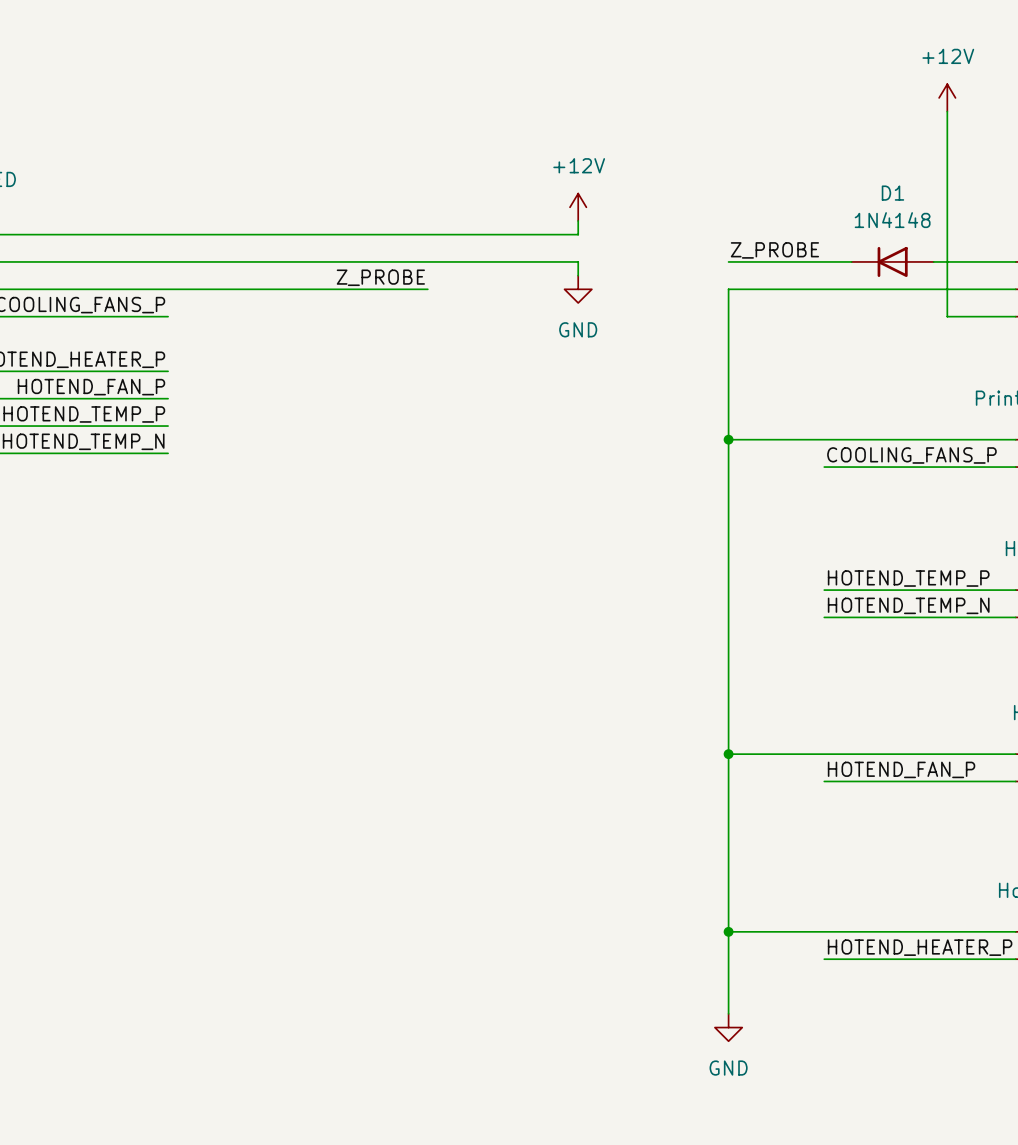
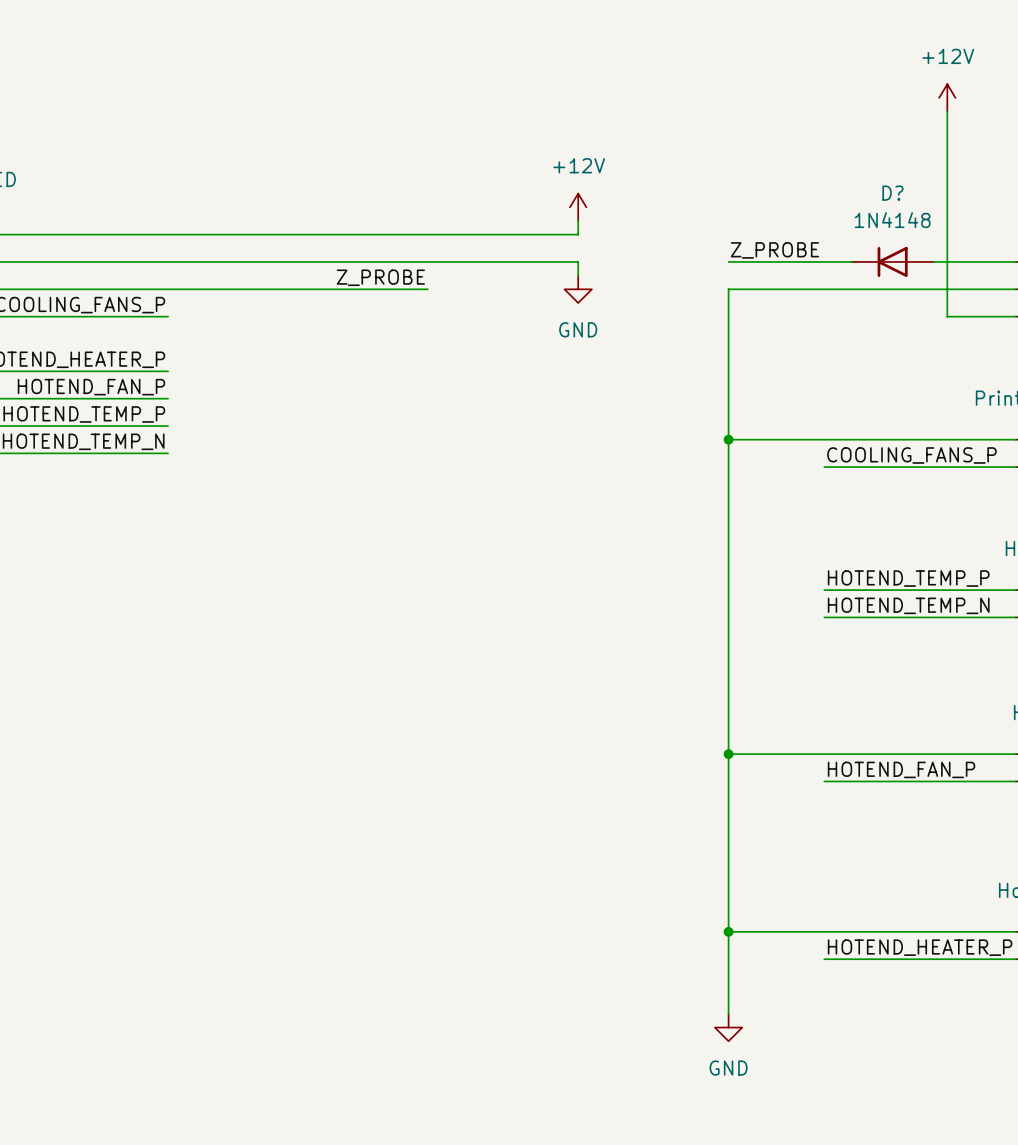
D1 name: D1 (892, 193) -> D? (892, 193)

